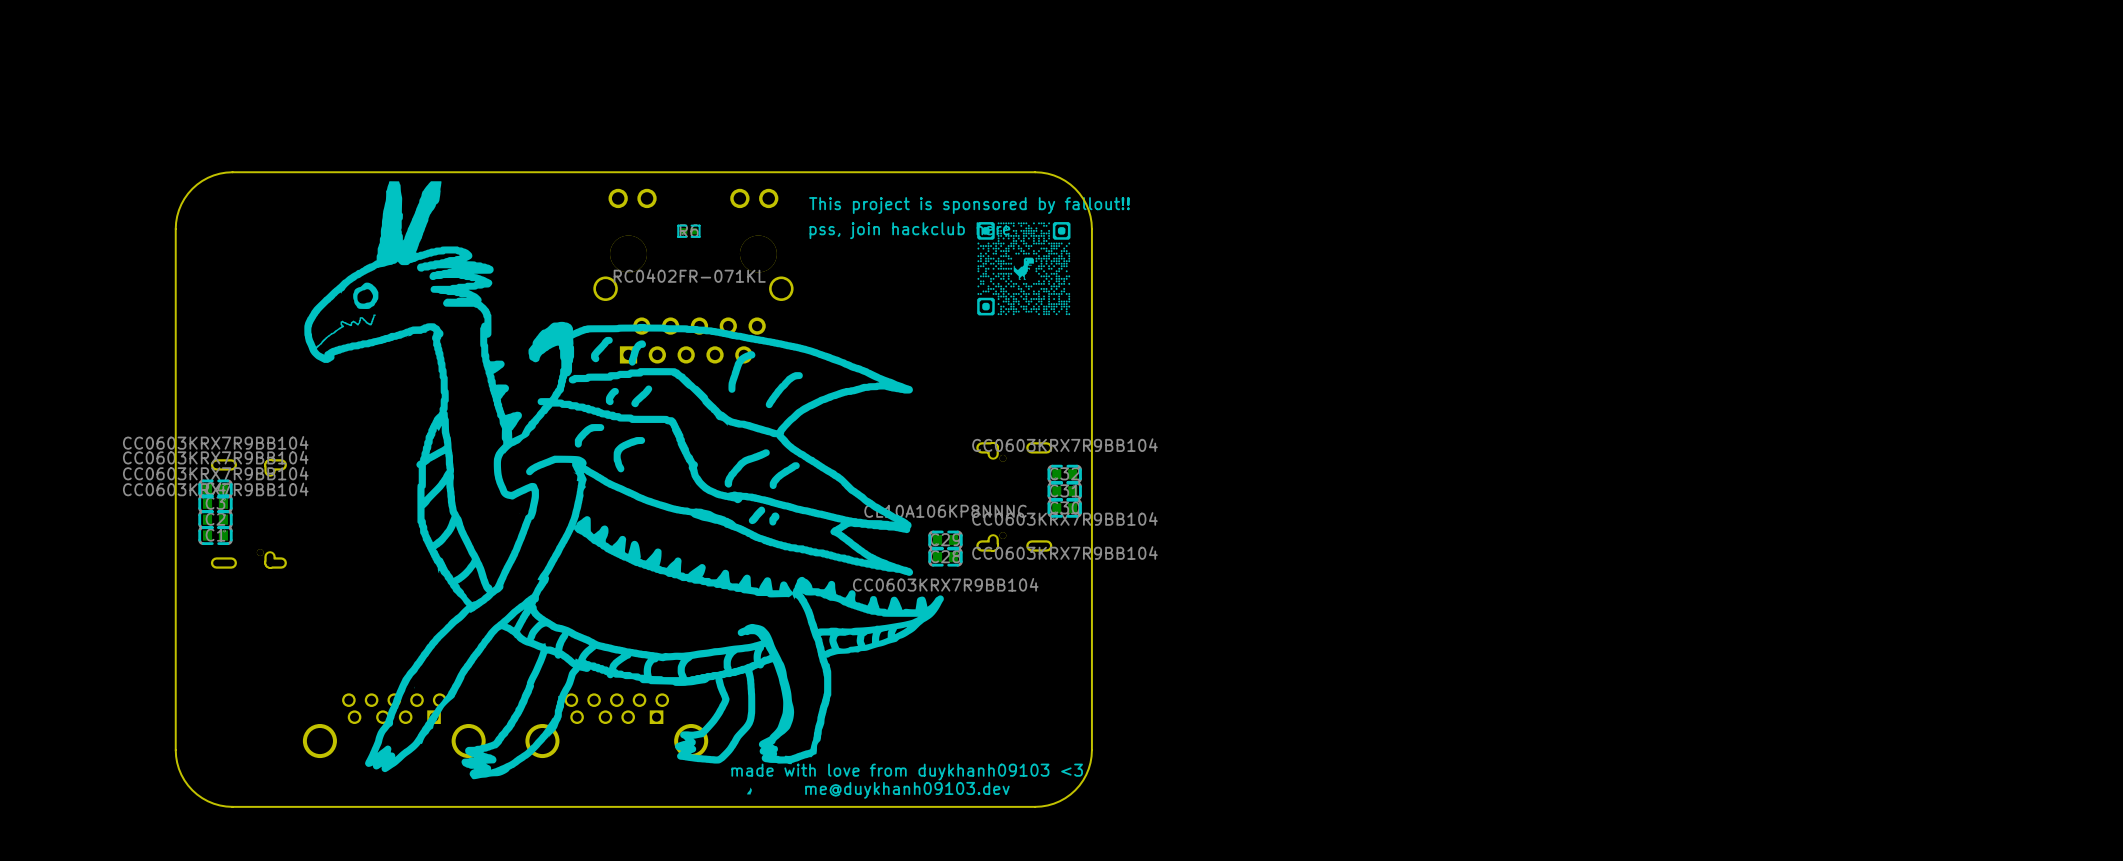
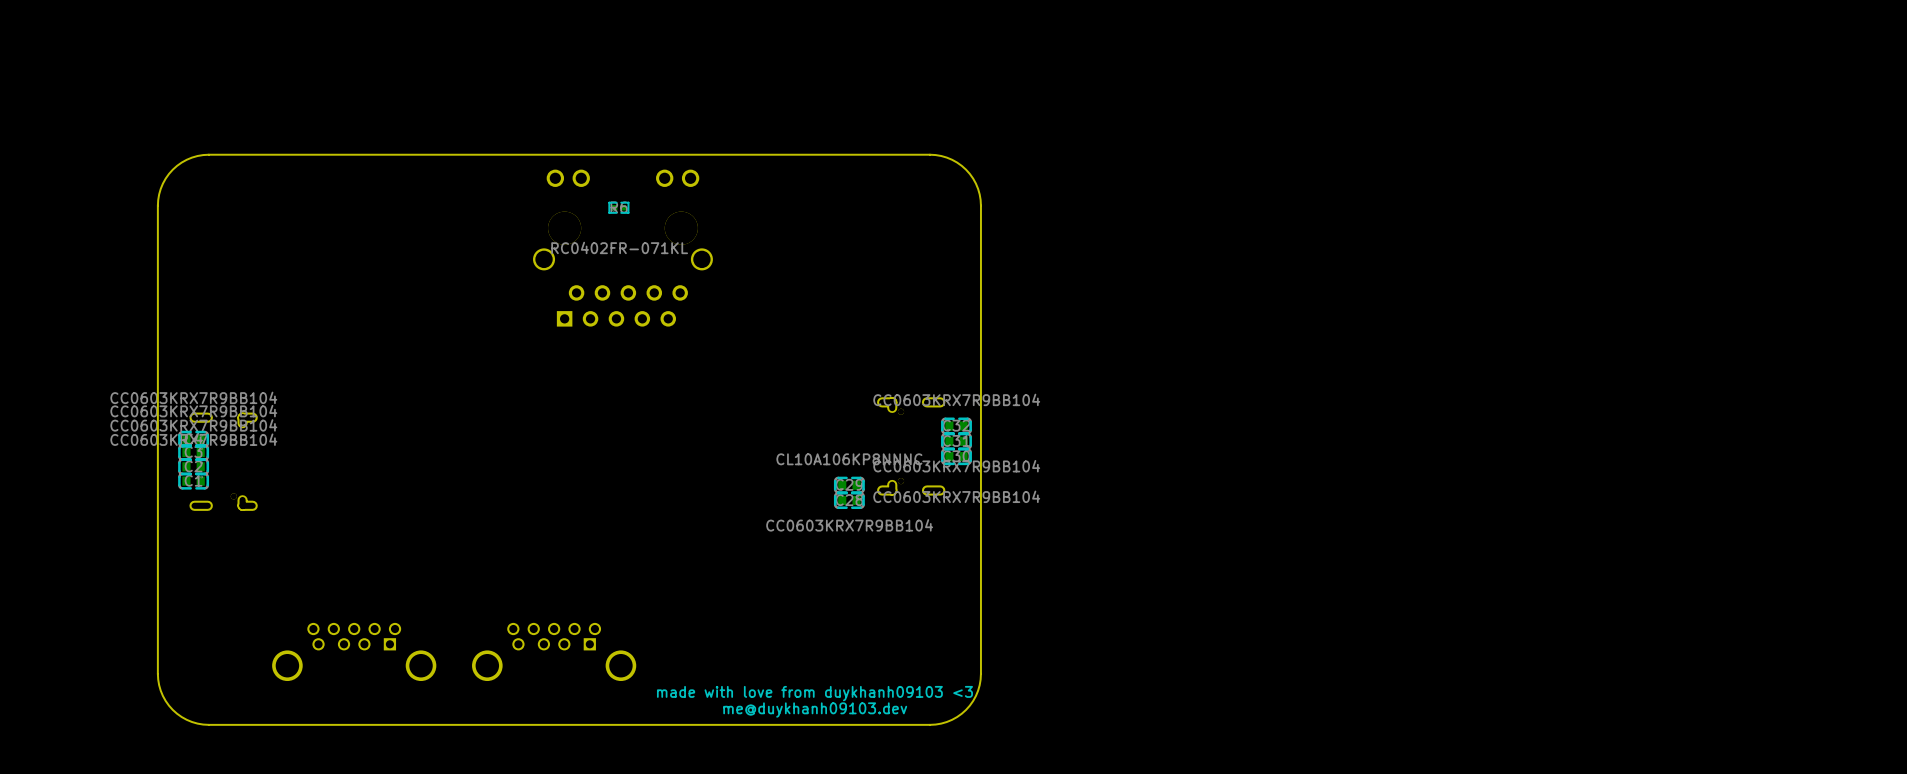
drawing: [304, 181, 944, 795] -> none
text: This project is sponsored by fallout!! (969, 205) -> none
drawing: [977, 222, 1071, 316] -> none
text: pss, join hackclub here (909, 230) -> none

